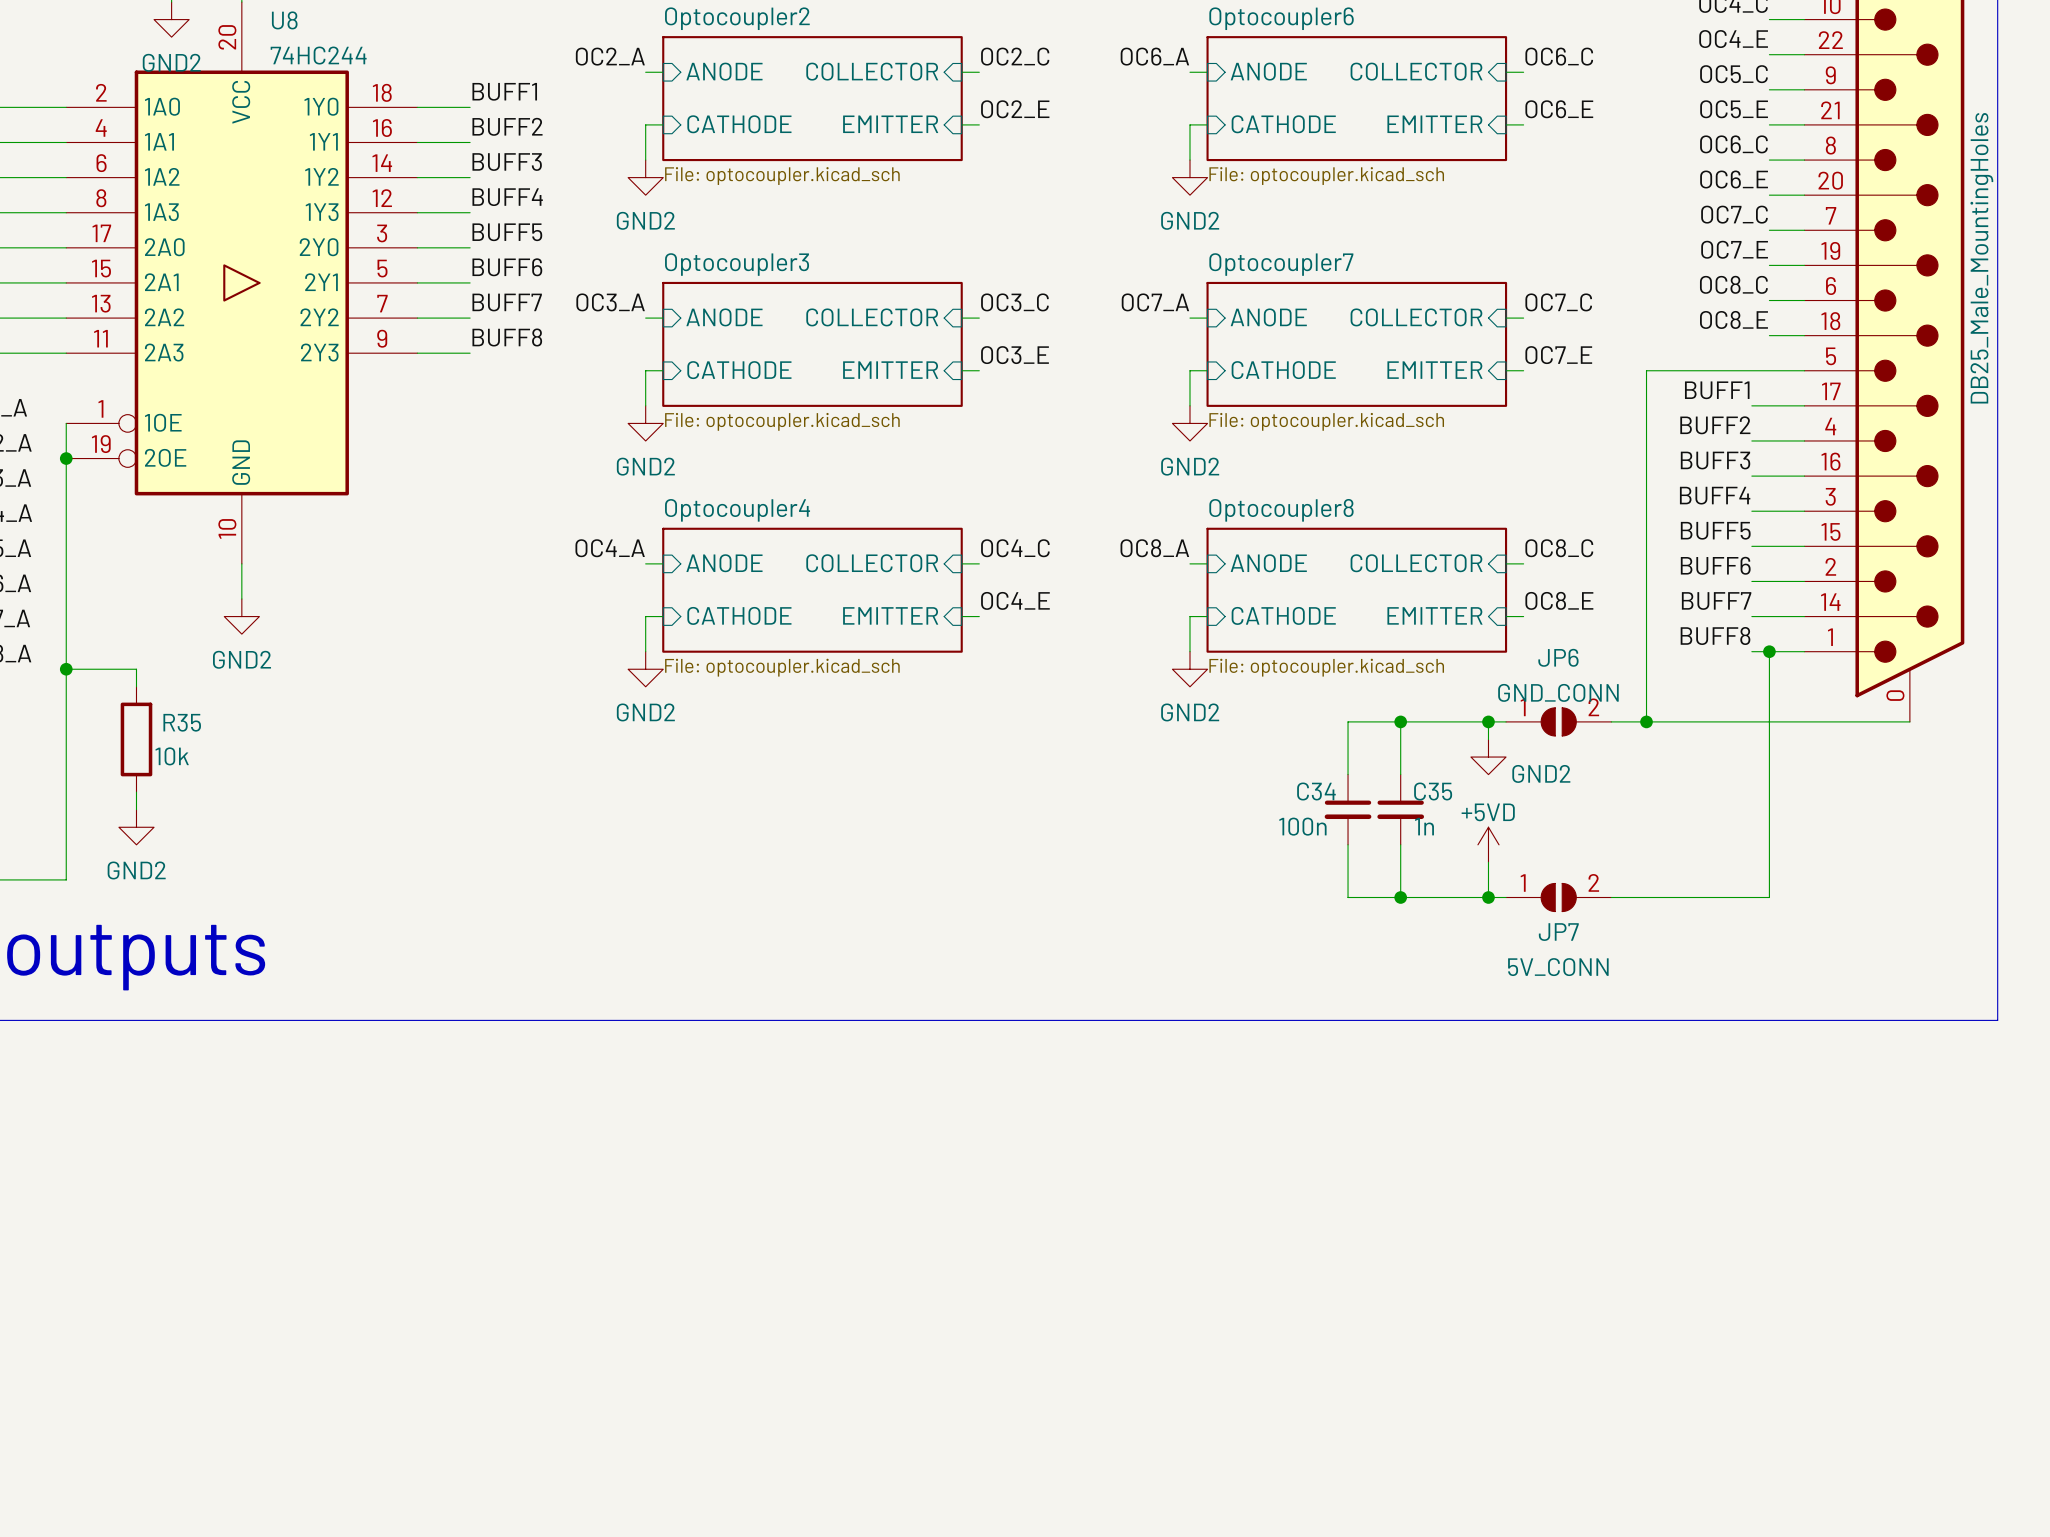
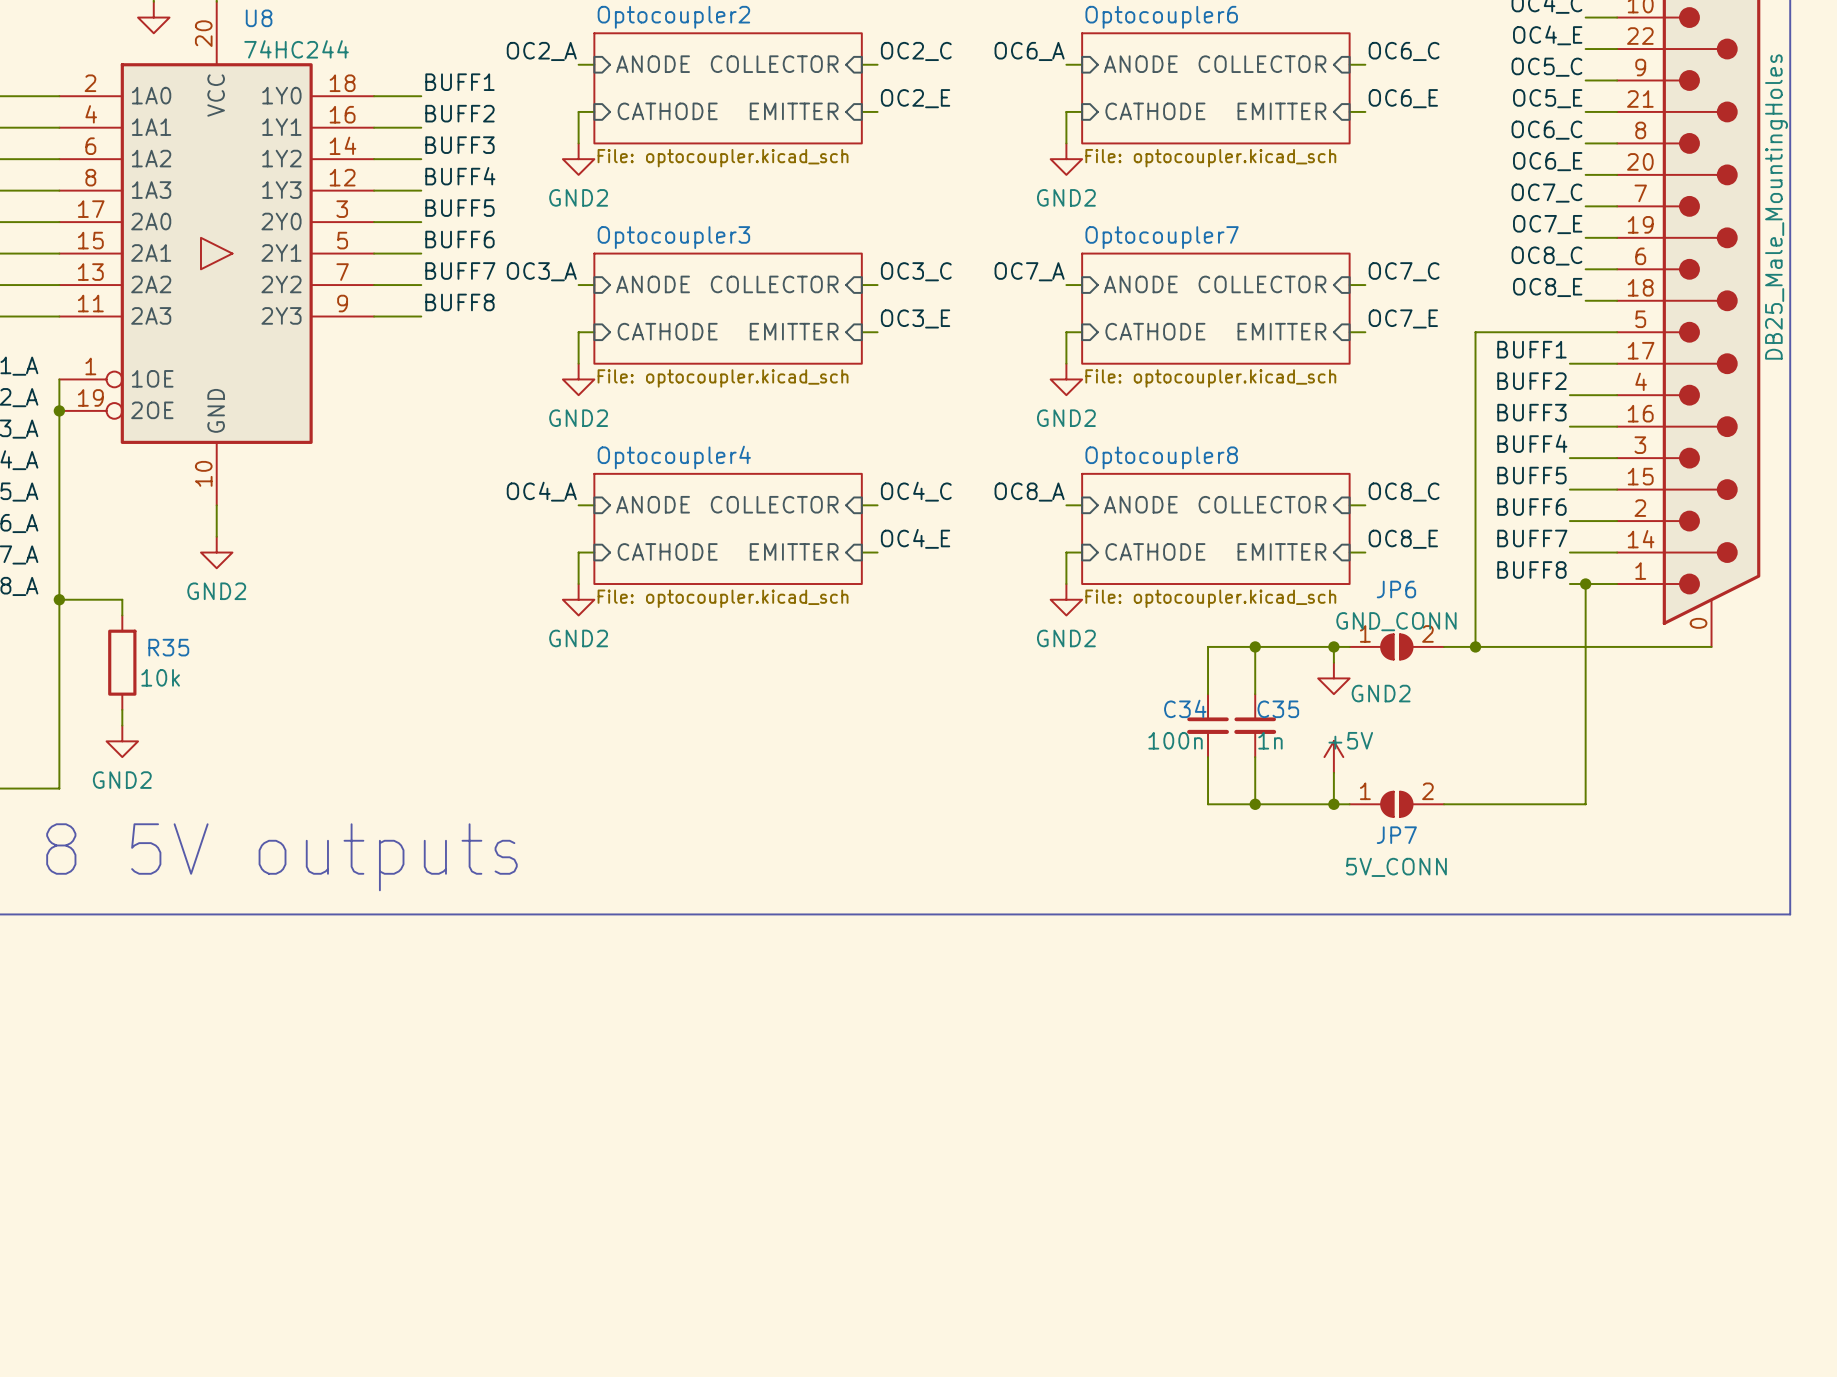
power symbol text: GND2 (171, 62) -> none
power symbol: +5VD (1488, 844) -> +5V (1333, 757)

